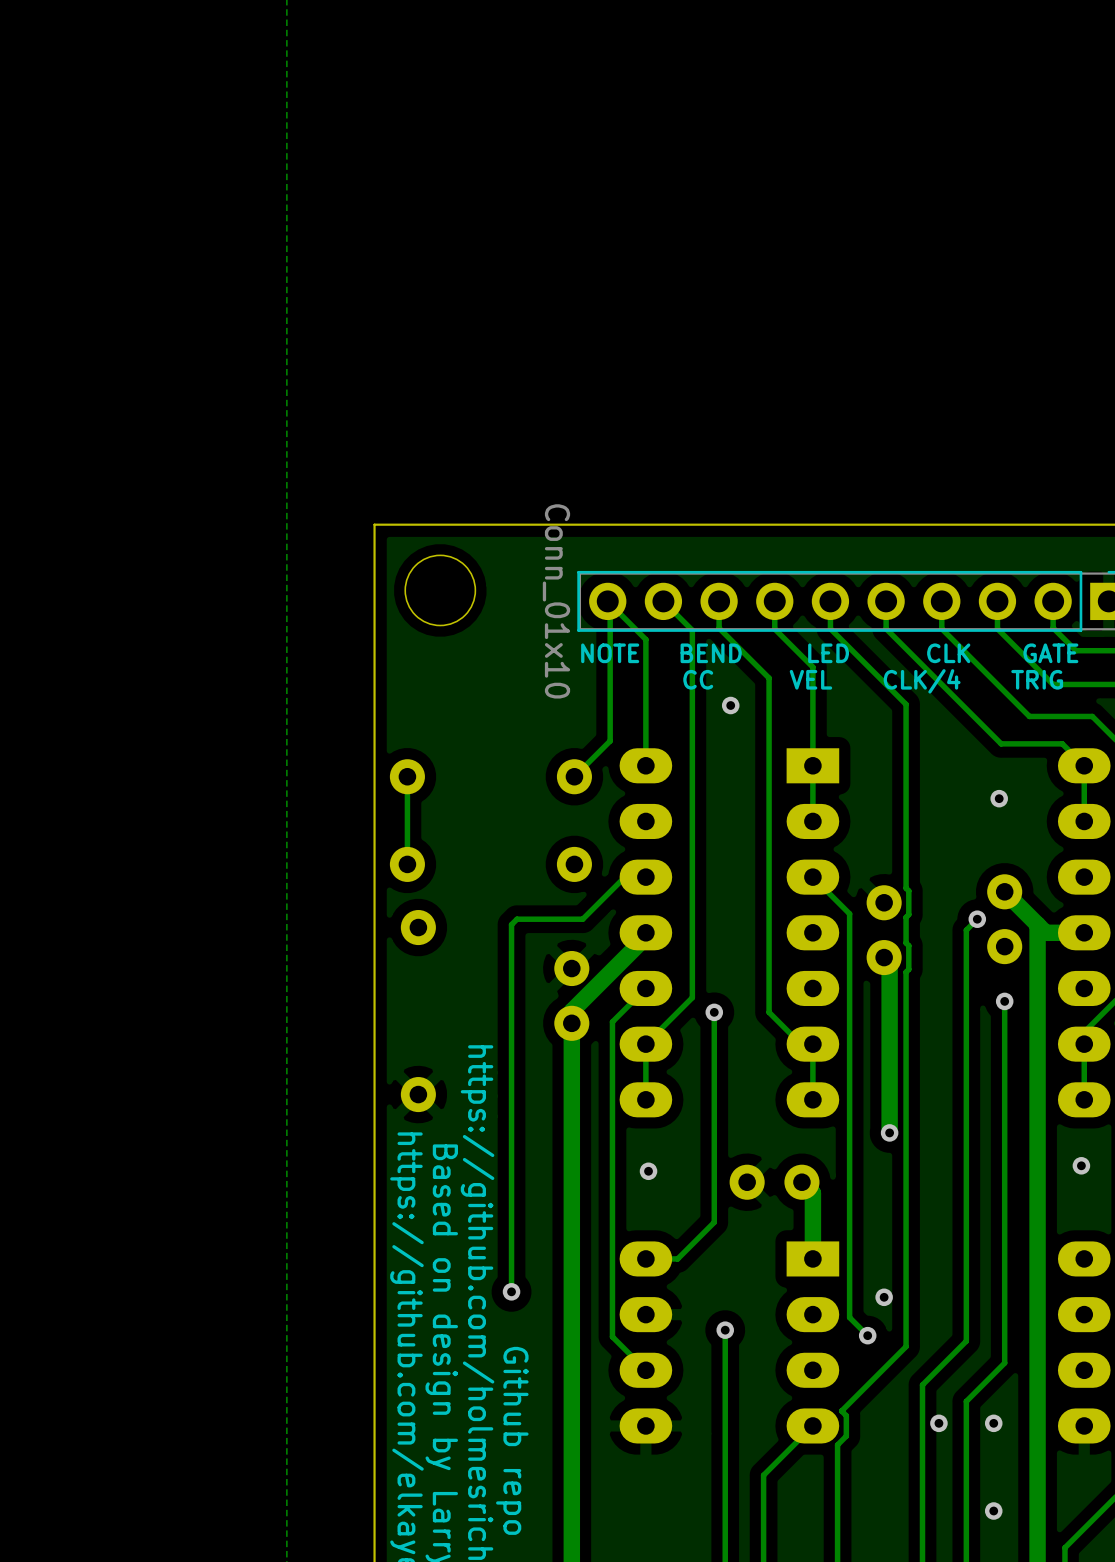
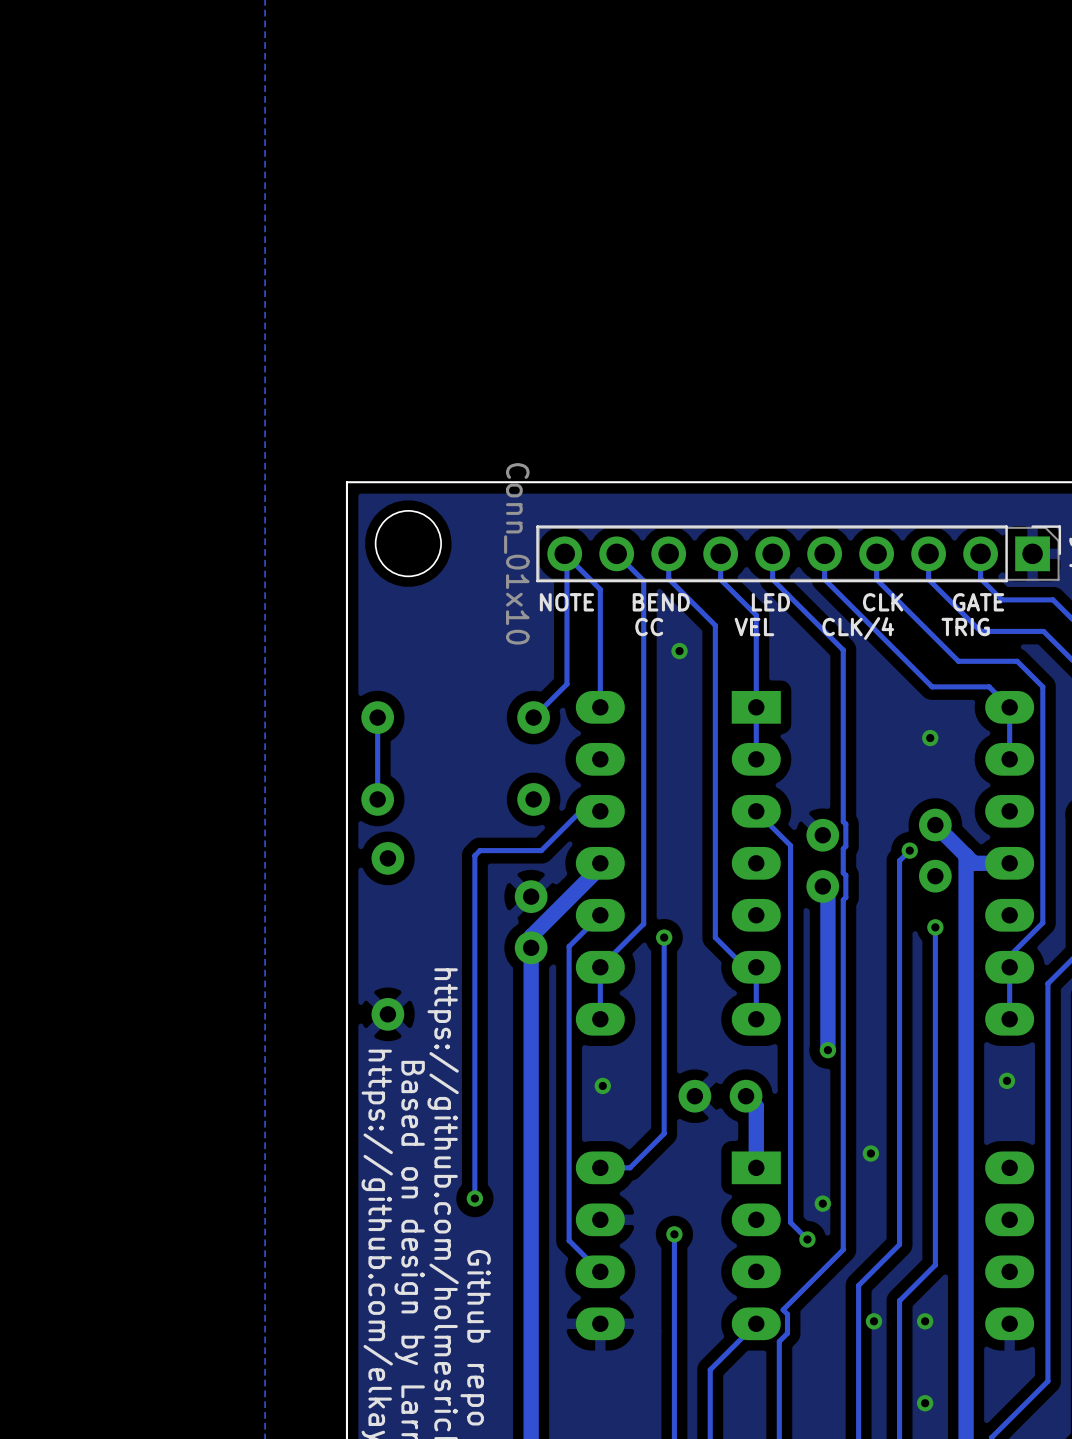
via: none -> (870, 1153)

